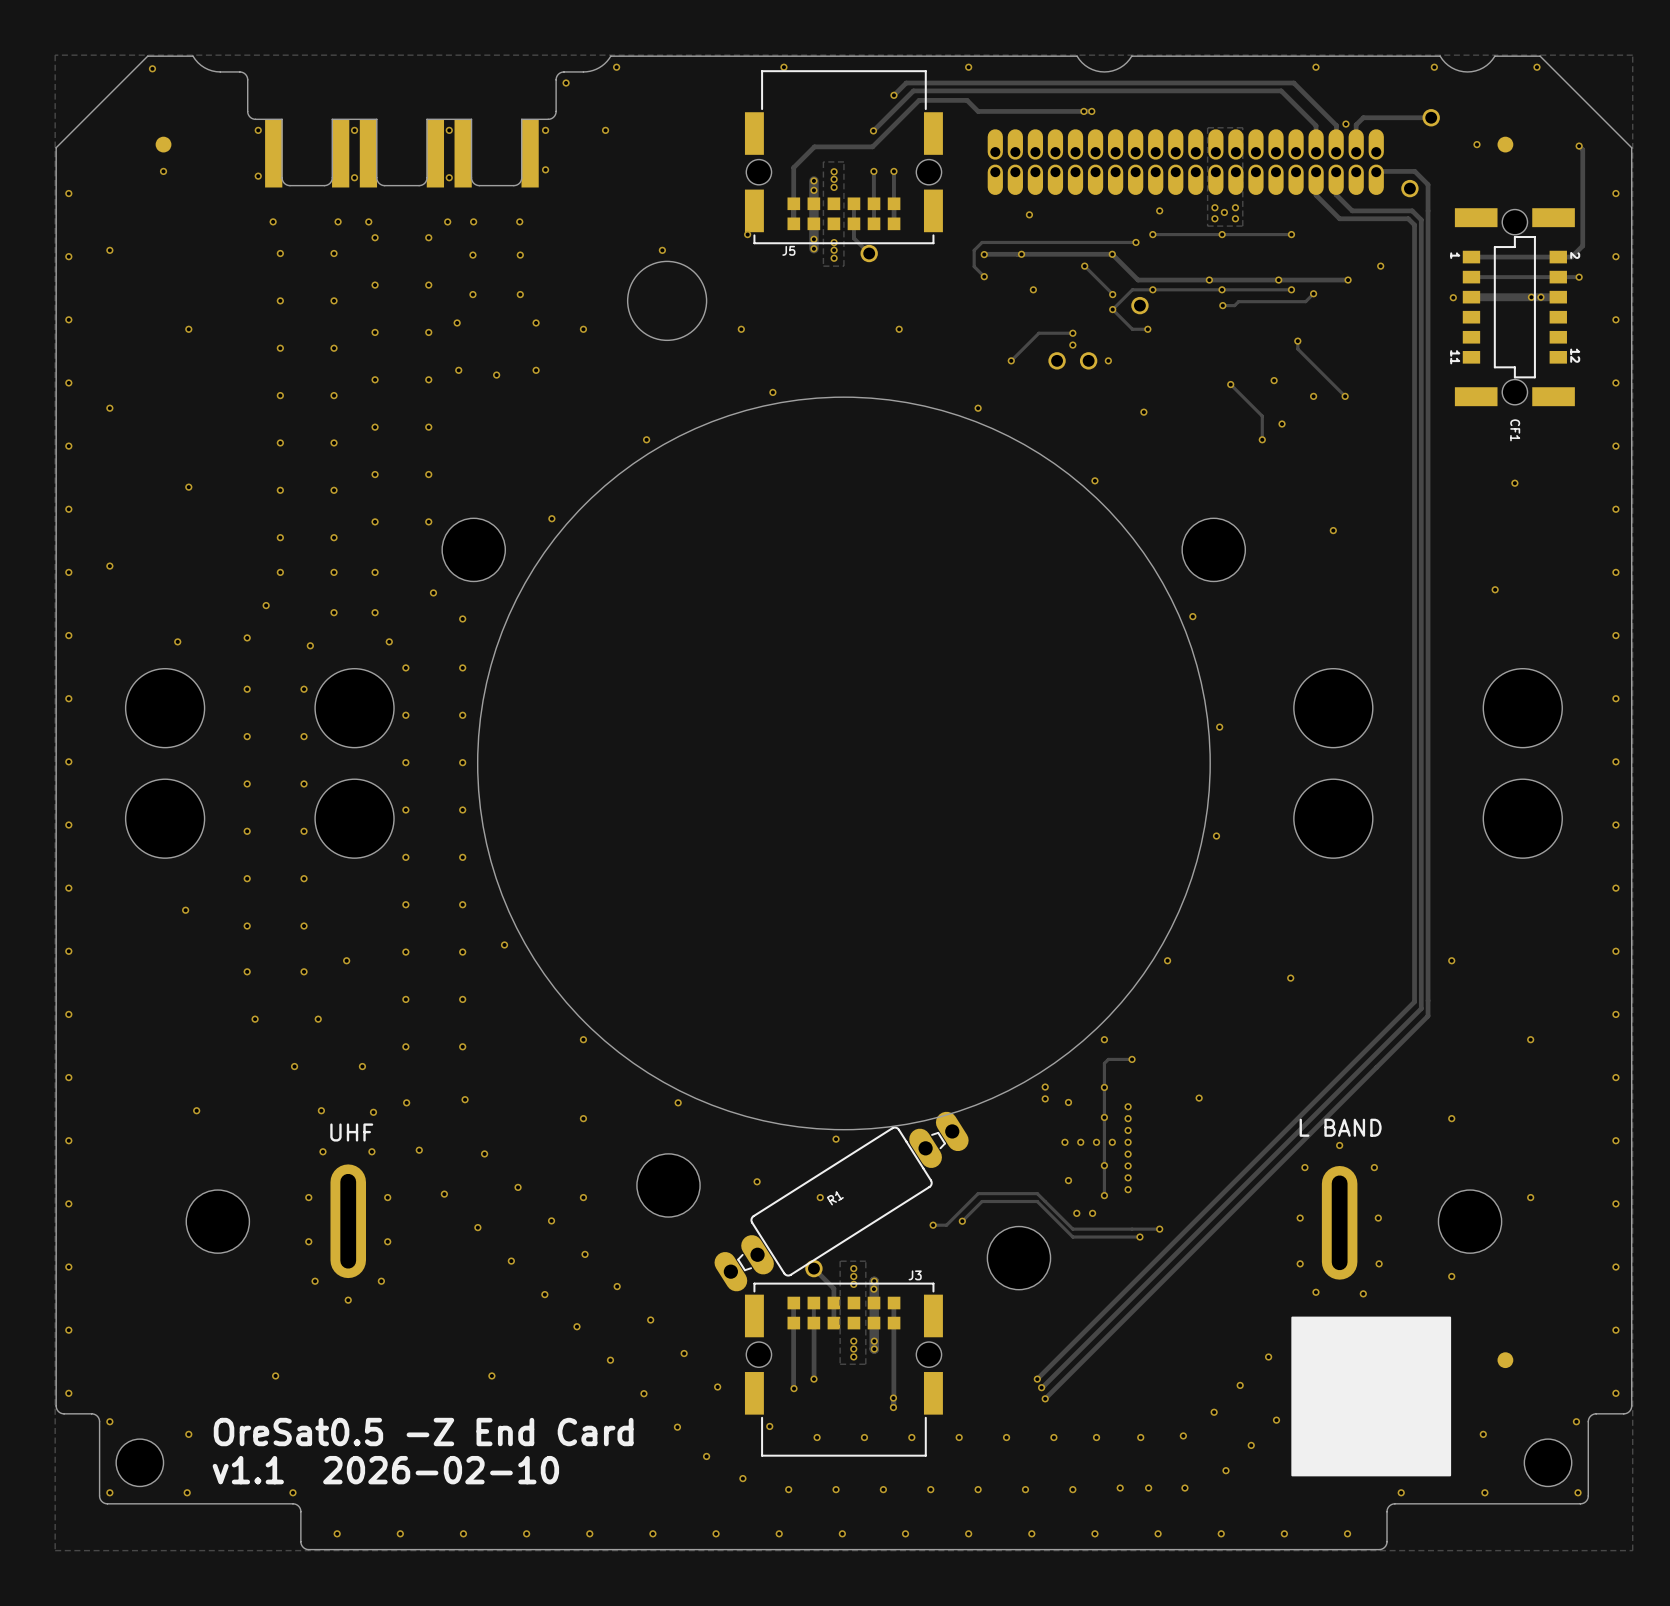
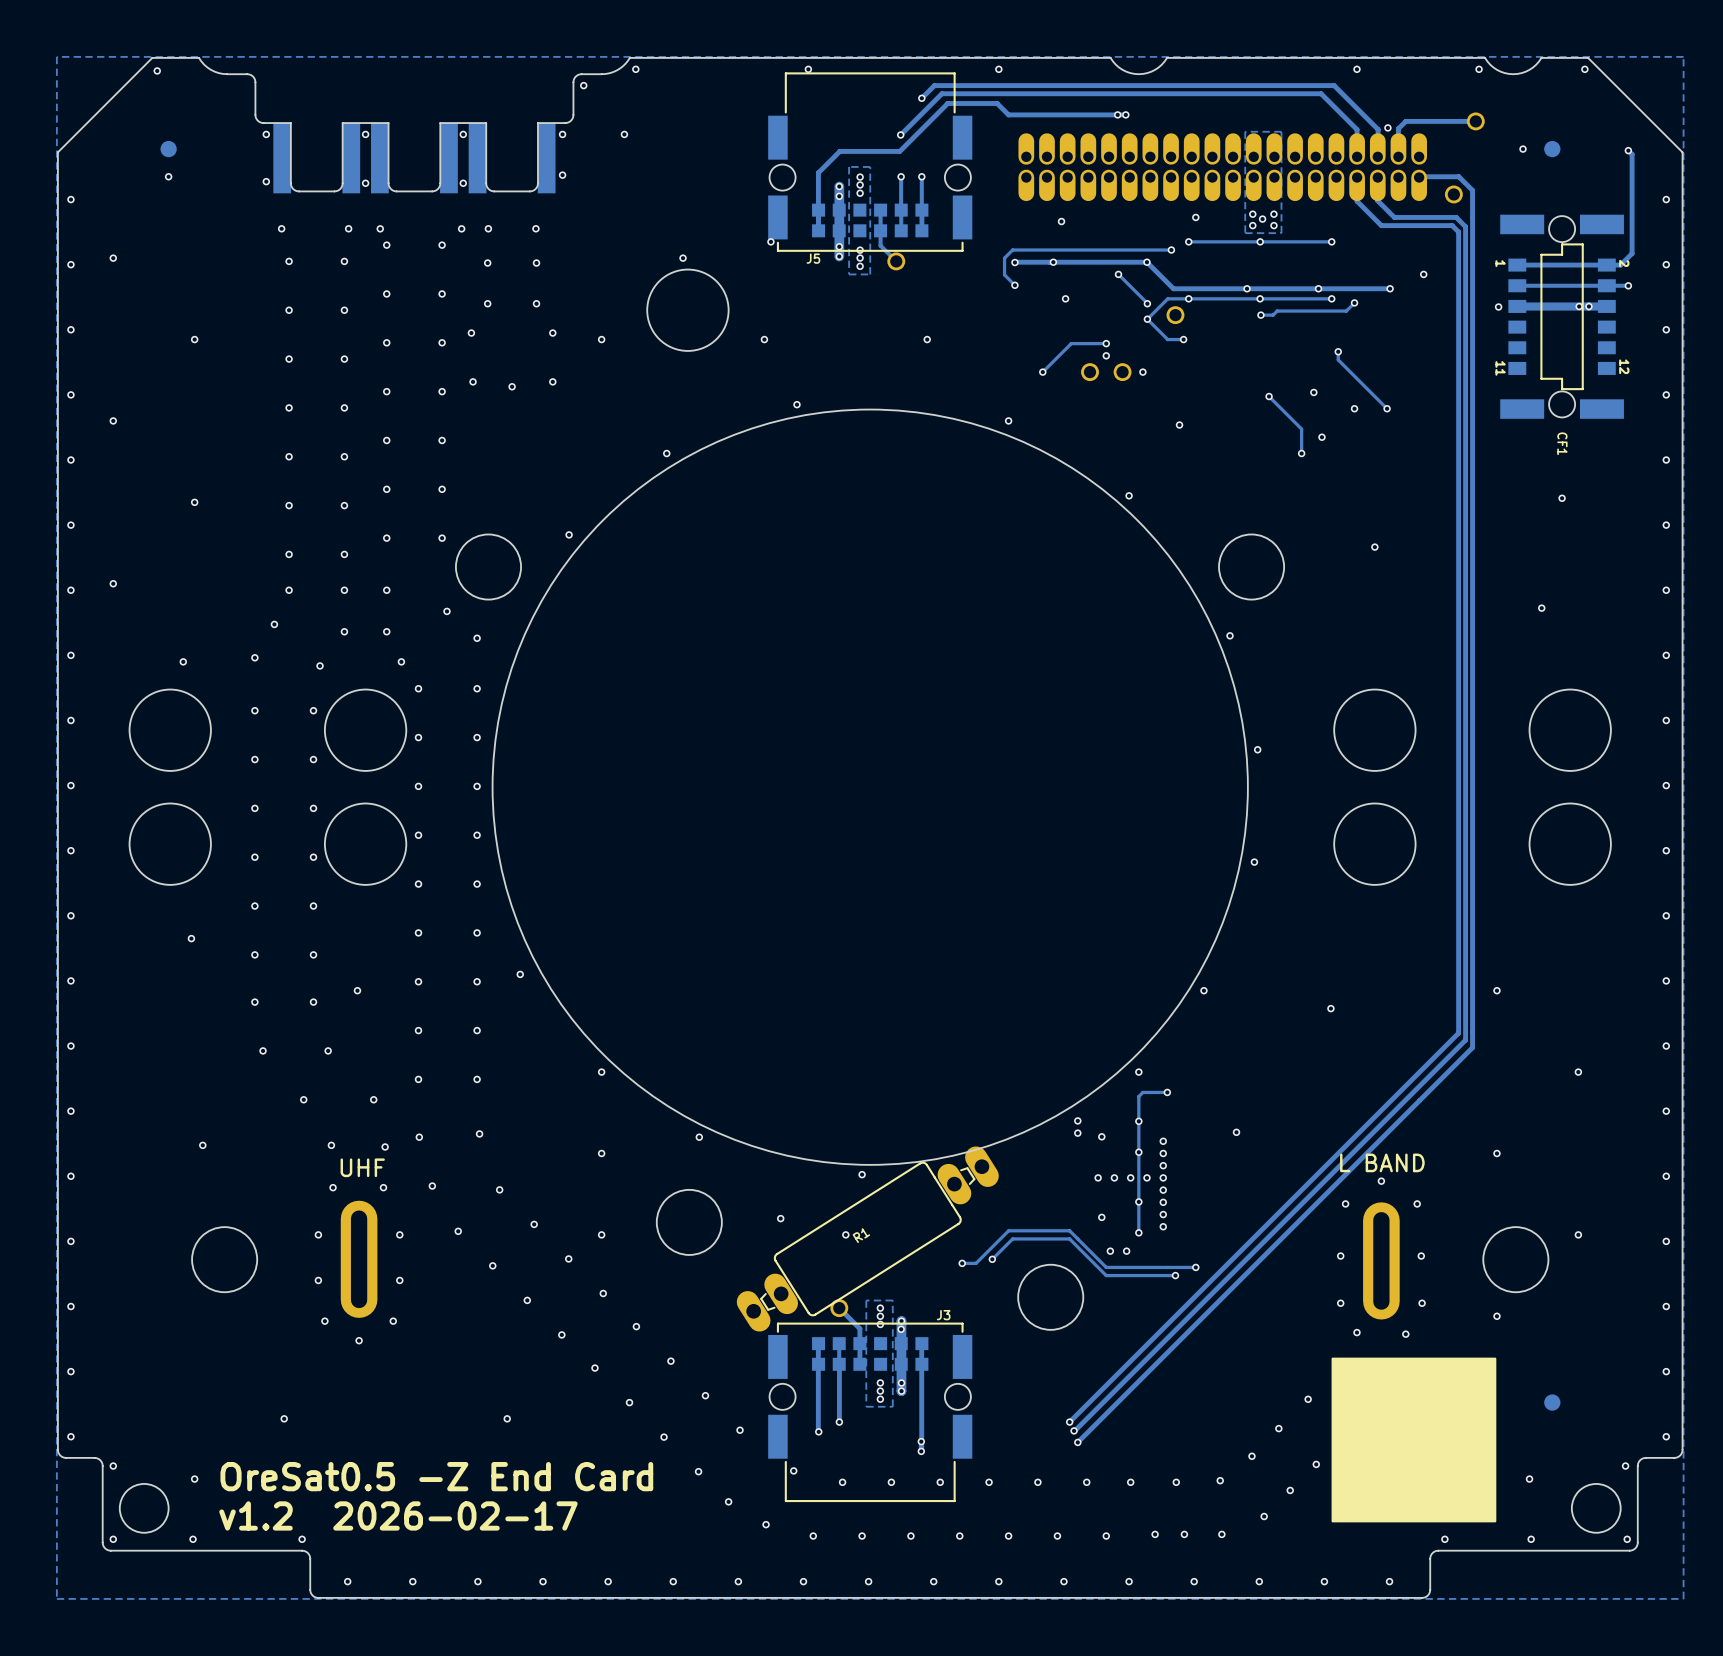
text: v1.1 2026-02-10 (385, 1470) -> v1.2 2026-02-17 (398, 1515)

